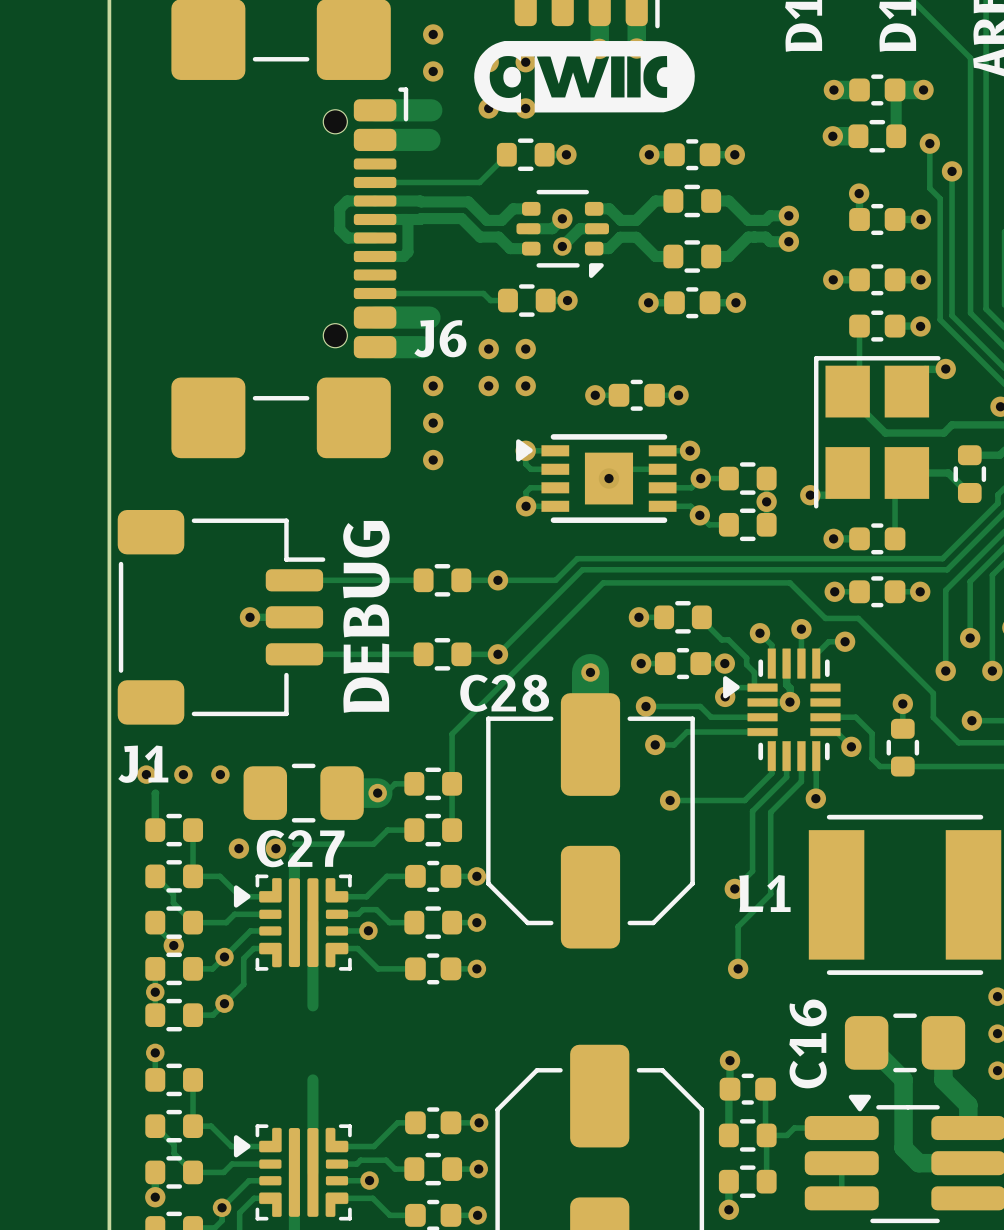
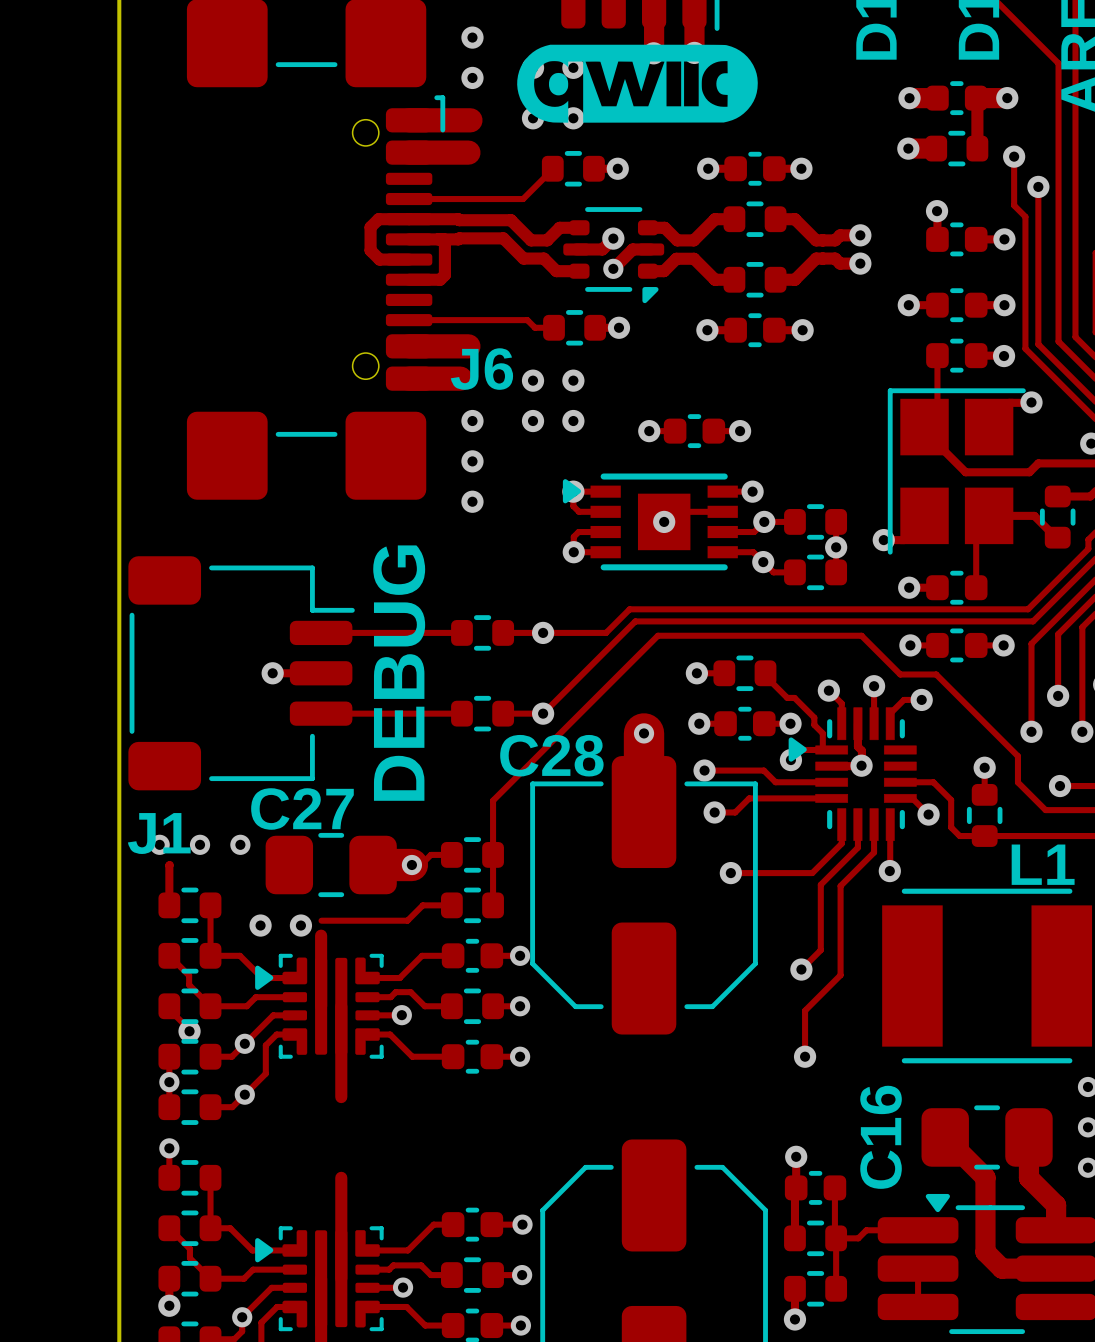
C27 name position: C27 (300, 848) -> C27 (302, 808)
L1 name position: L1 (764, 893) -> L1 (1043, 864)

